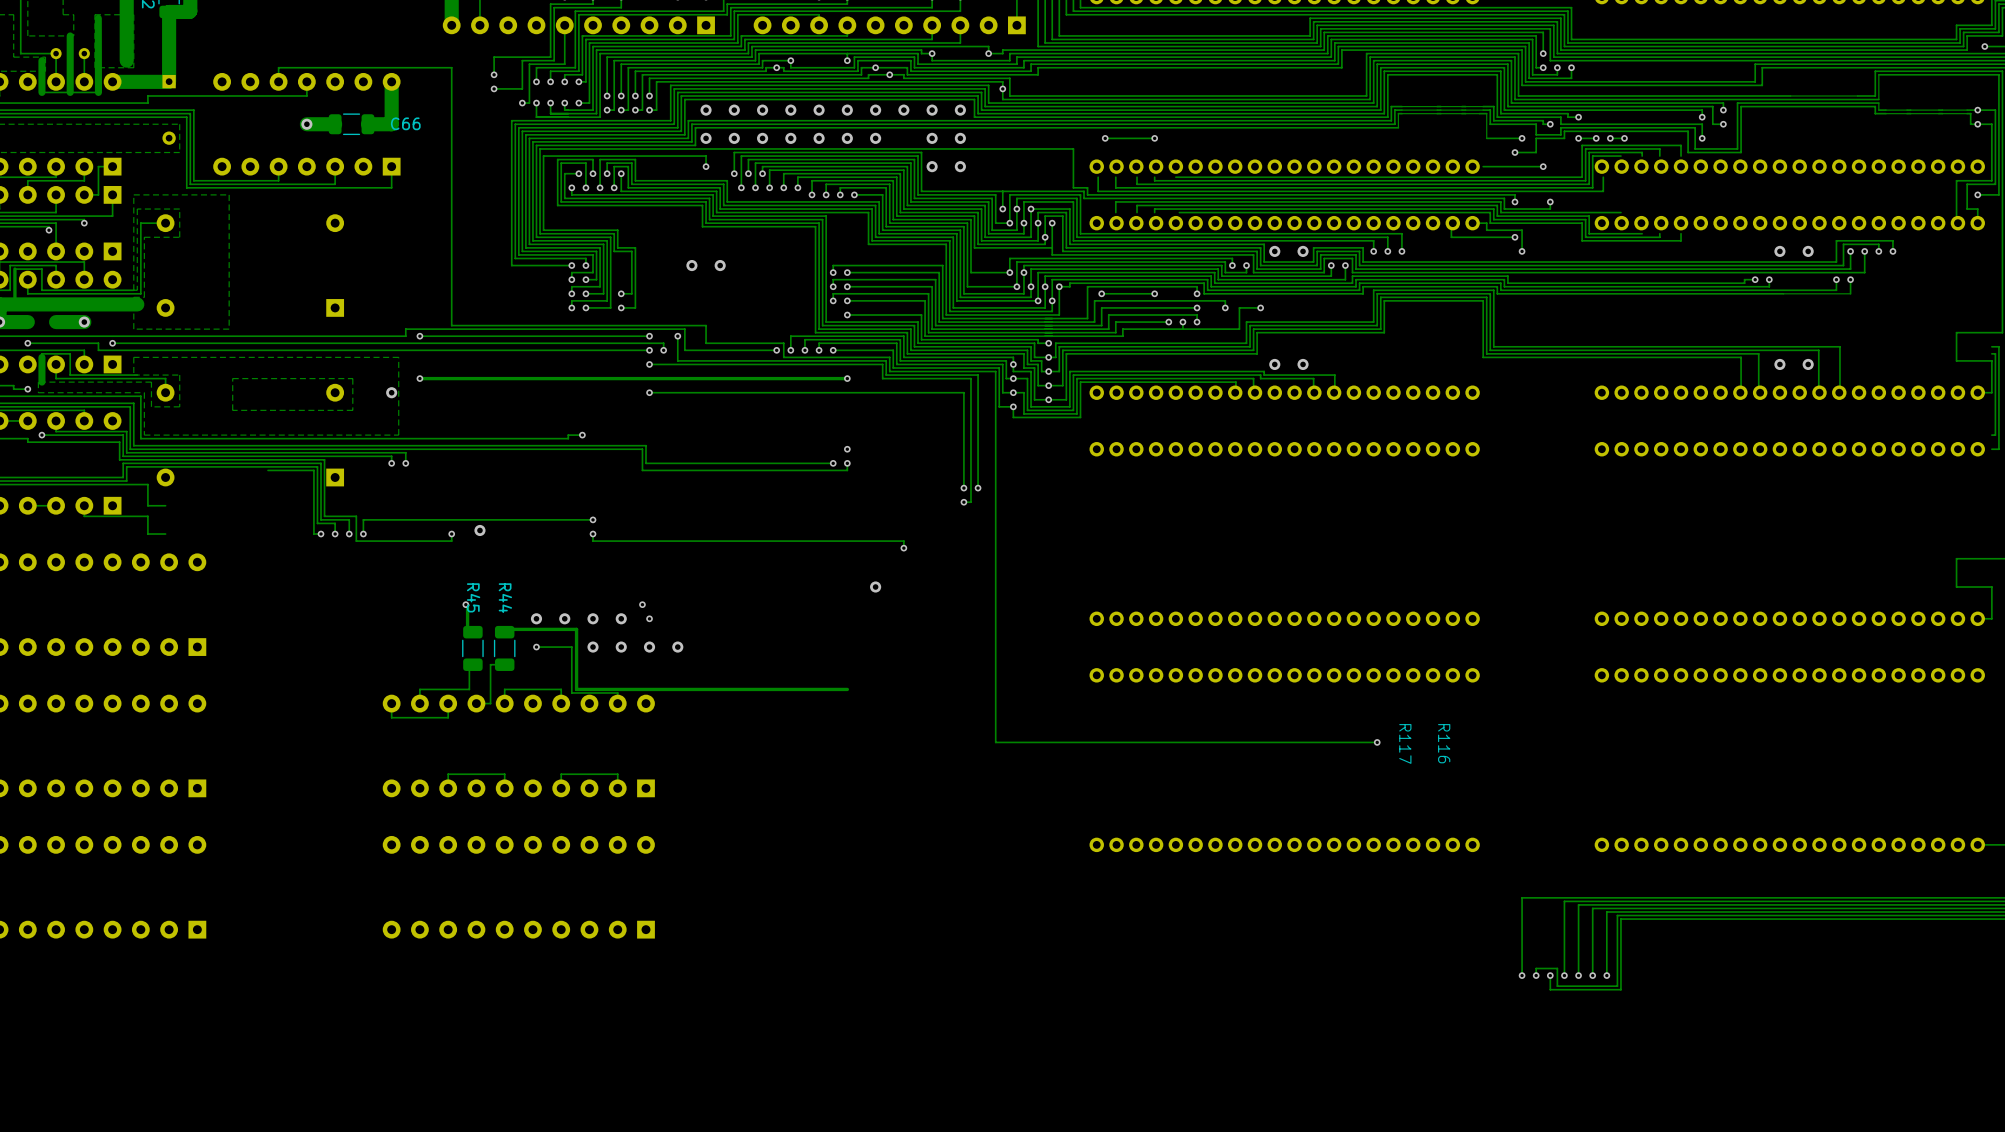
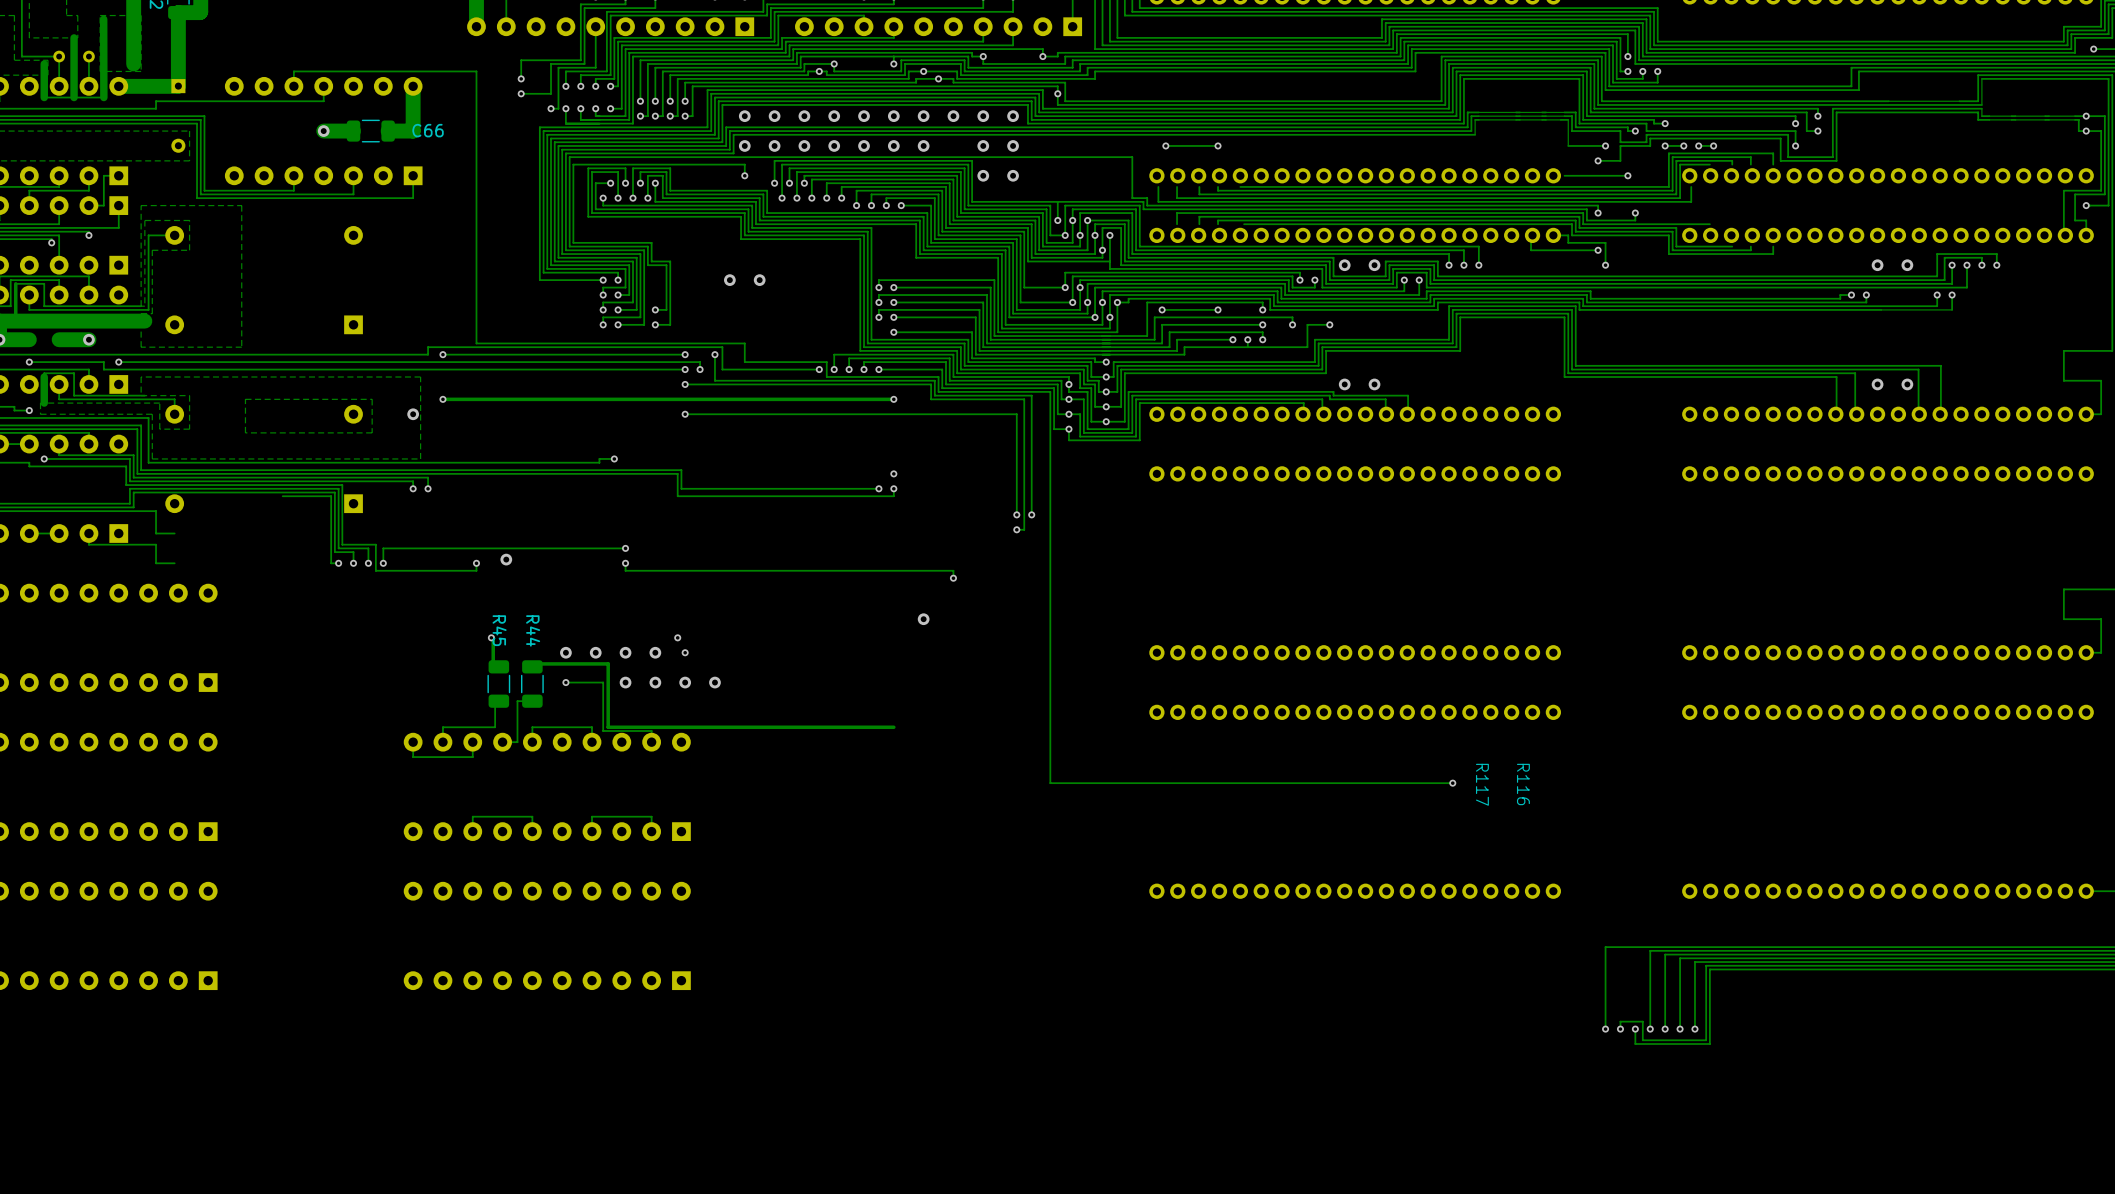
track: (1991, 346) (1998, 346) (1998, 449) (1991, 449) -> none
track: (1991, 353) (1995, 353) (1995, 435) (1991, 435) -> none

